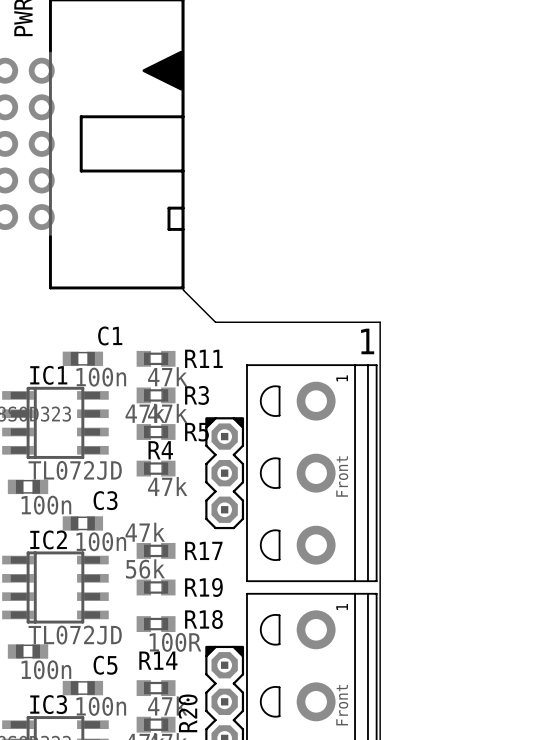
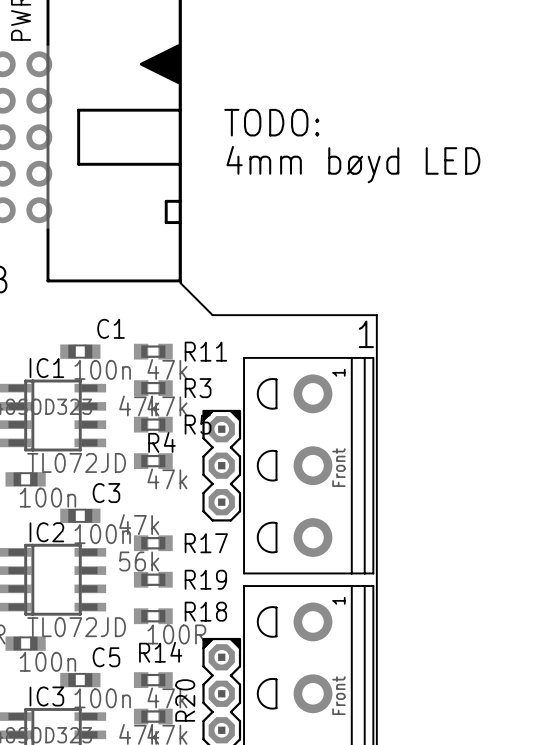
text: none -> TODO: (271, 122)
text: none -> 4mm bøyd LED (353, 164)

